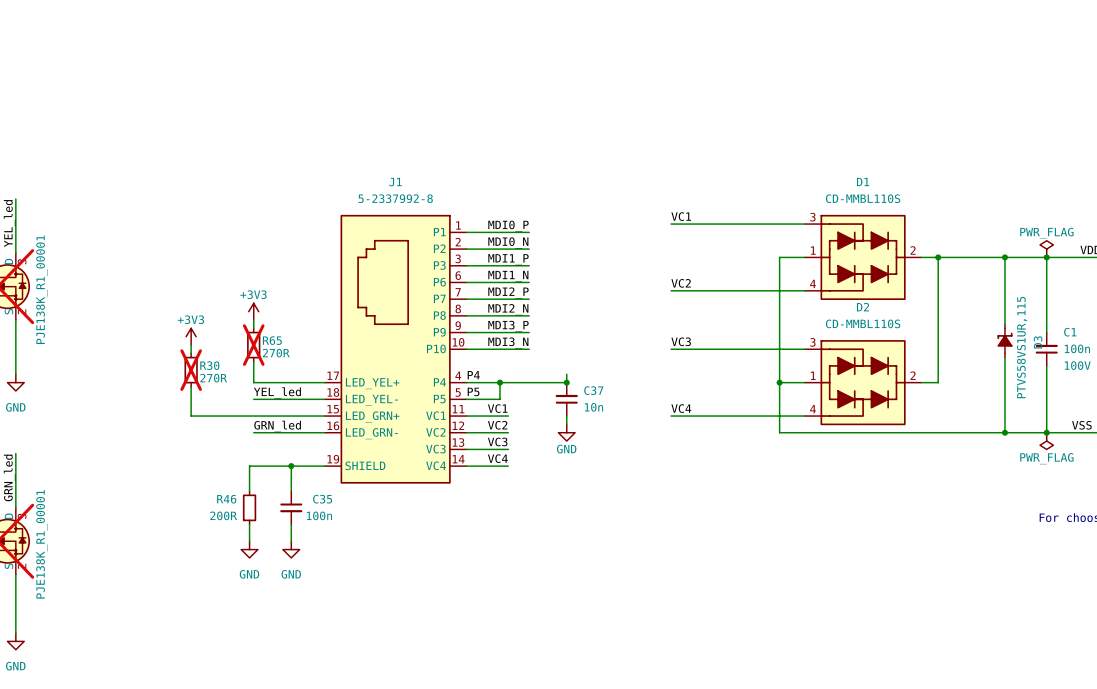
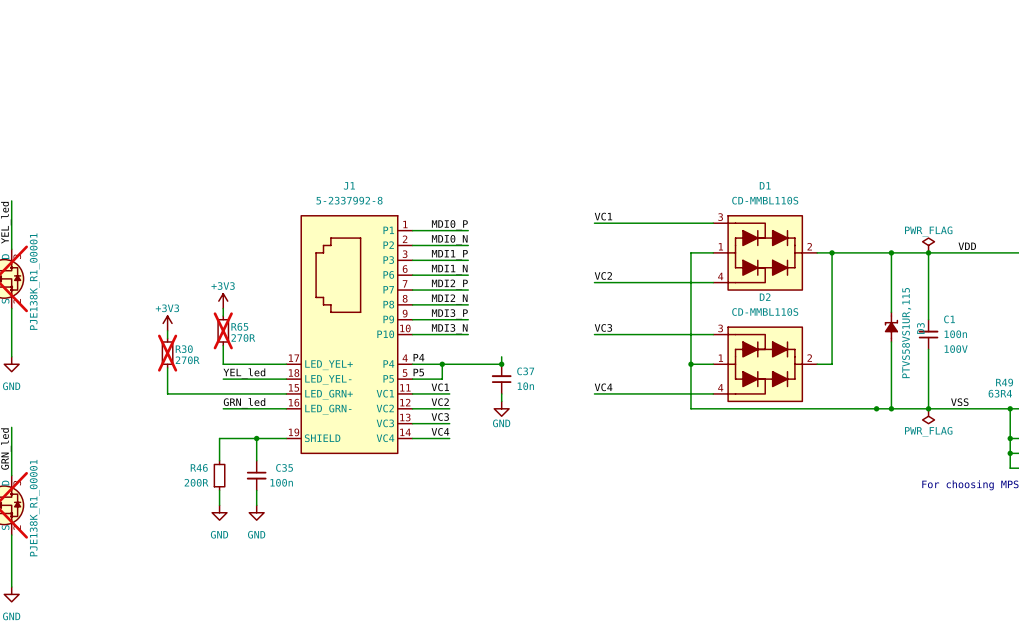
junction: none -> (876, 408)

